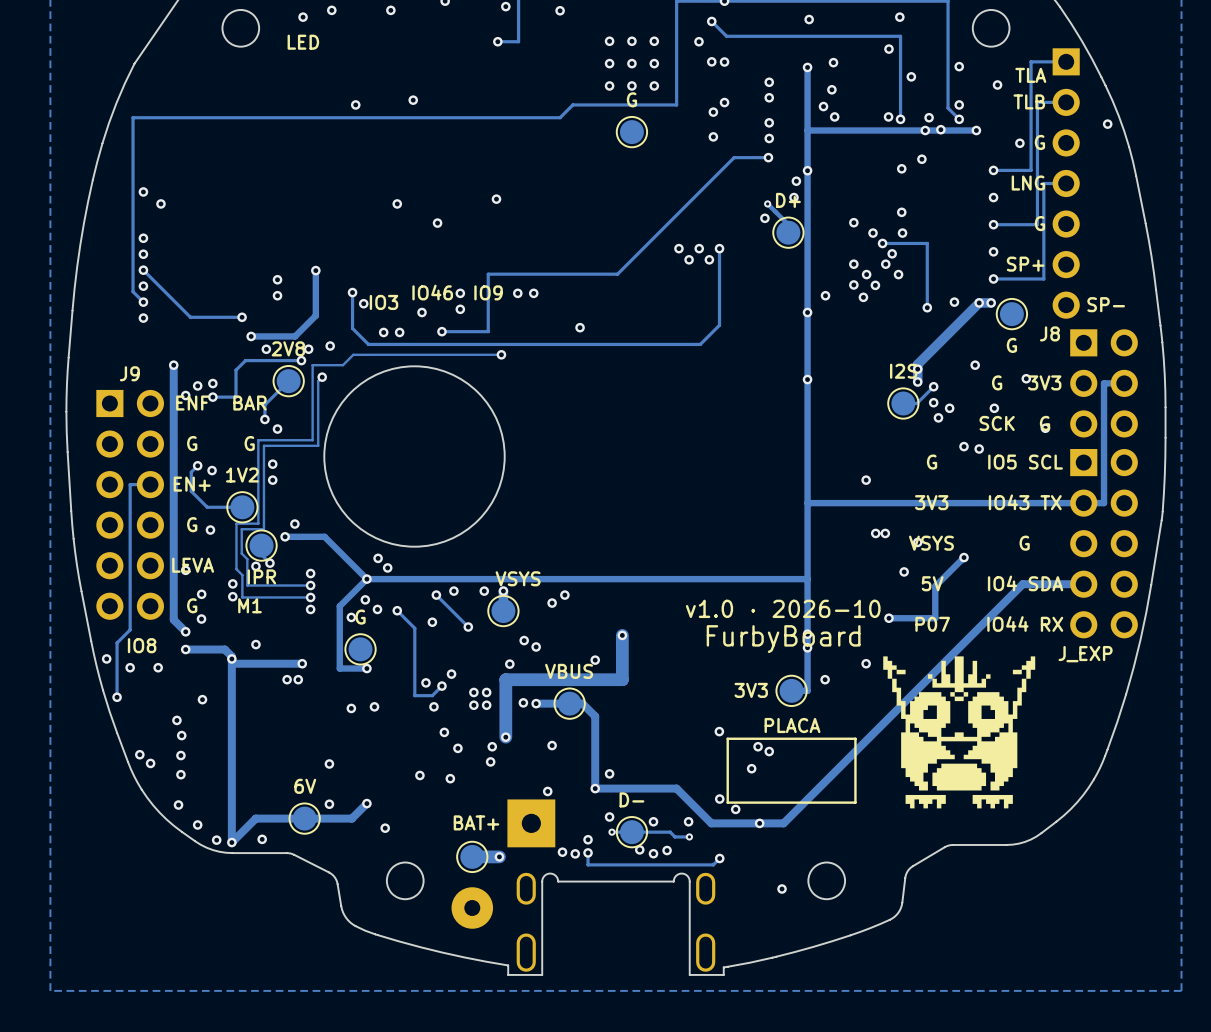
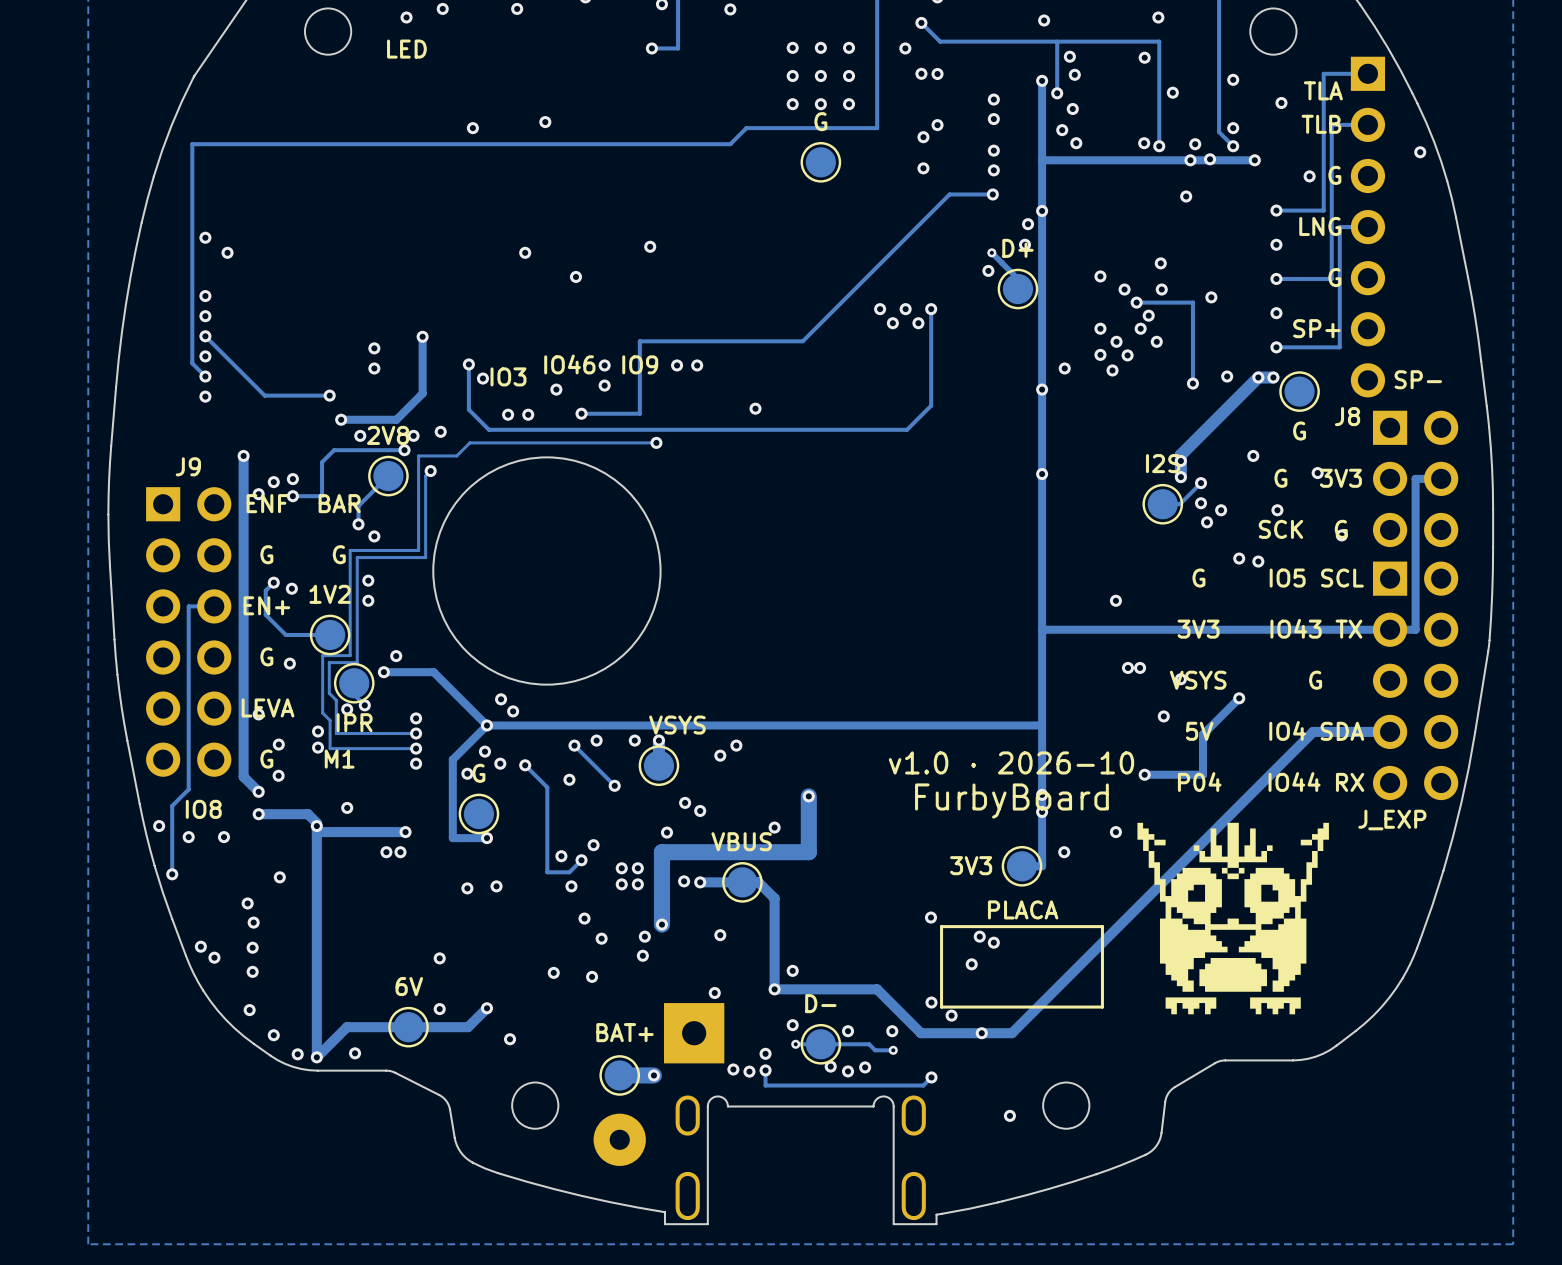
track: none -> (1057, 41) (1057, 93)
via: none -> (1069, 56)
via: none -> (1057, 93)
via: (901, 168) -> none
via: none -> (1211, 297)
text: P07 (932, 624) -> P04 (1199, 782)

